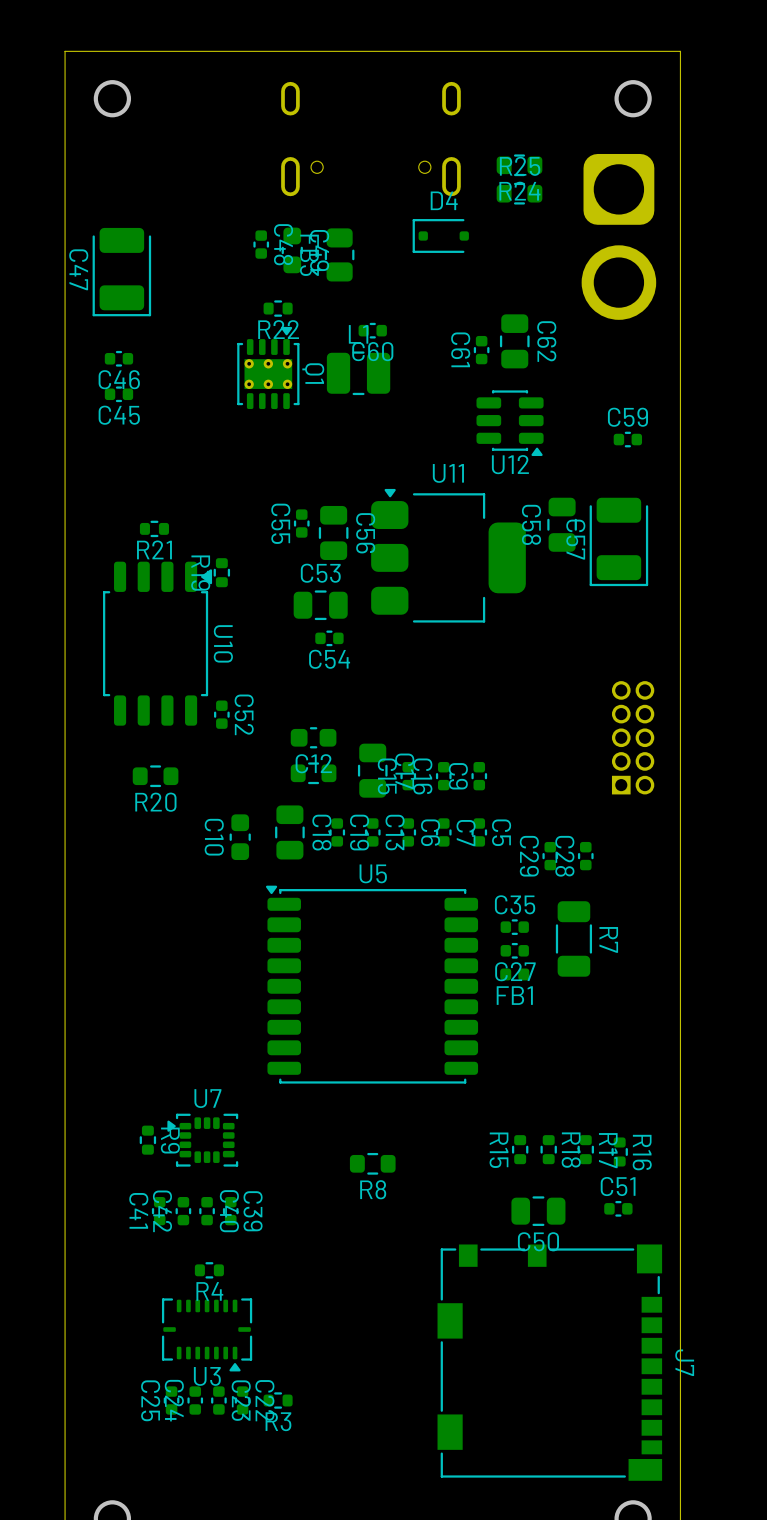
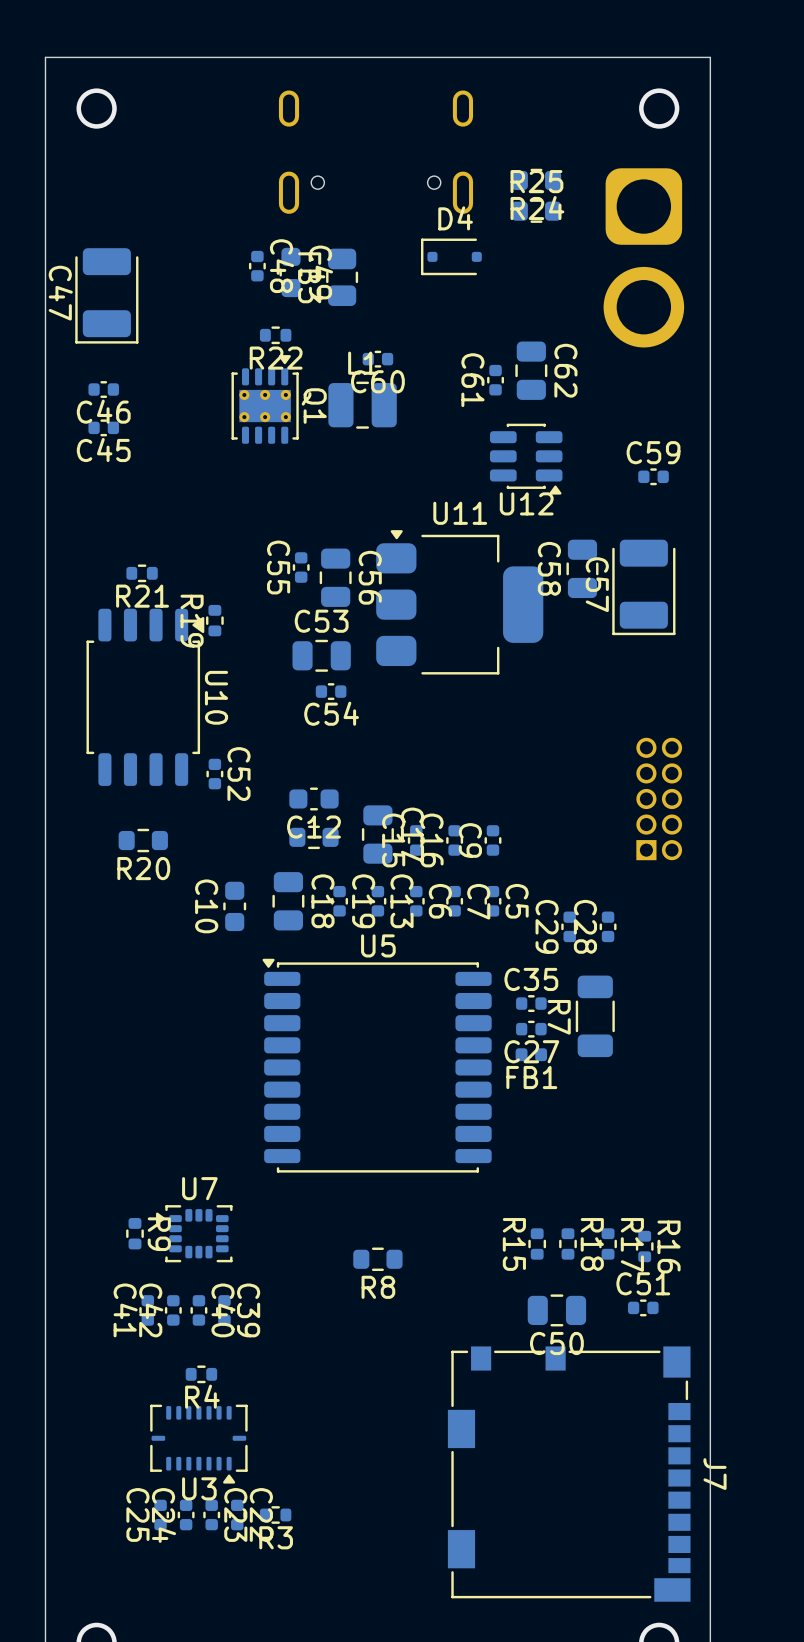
R7 name position: R7 (608, 939) -> R7 (559, 1017)

